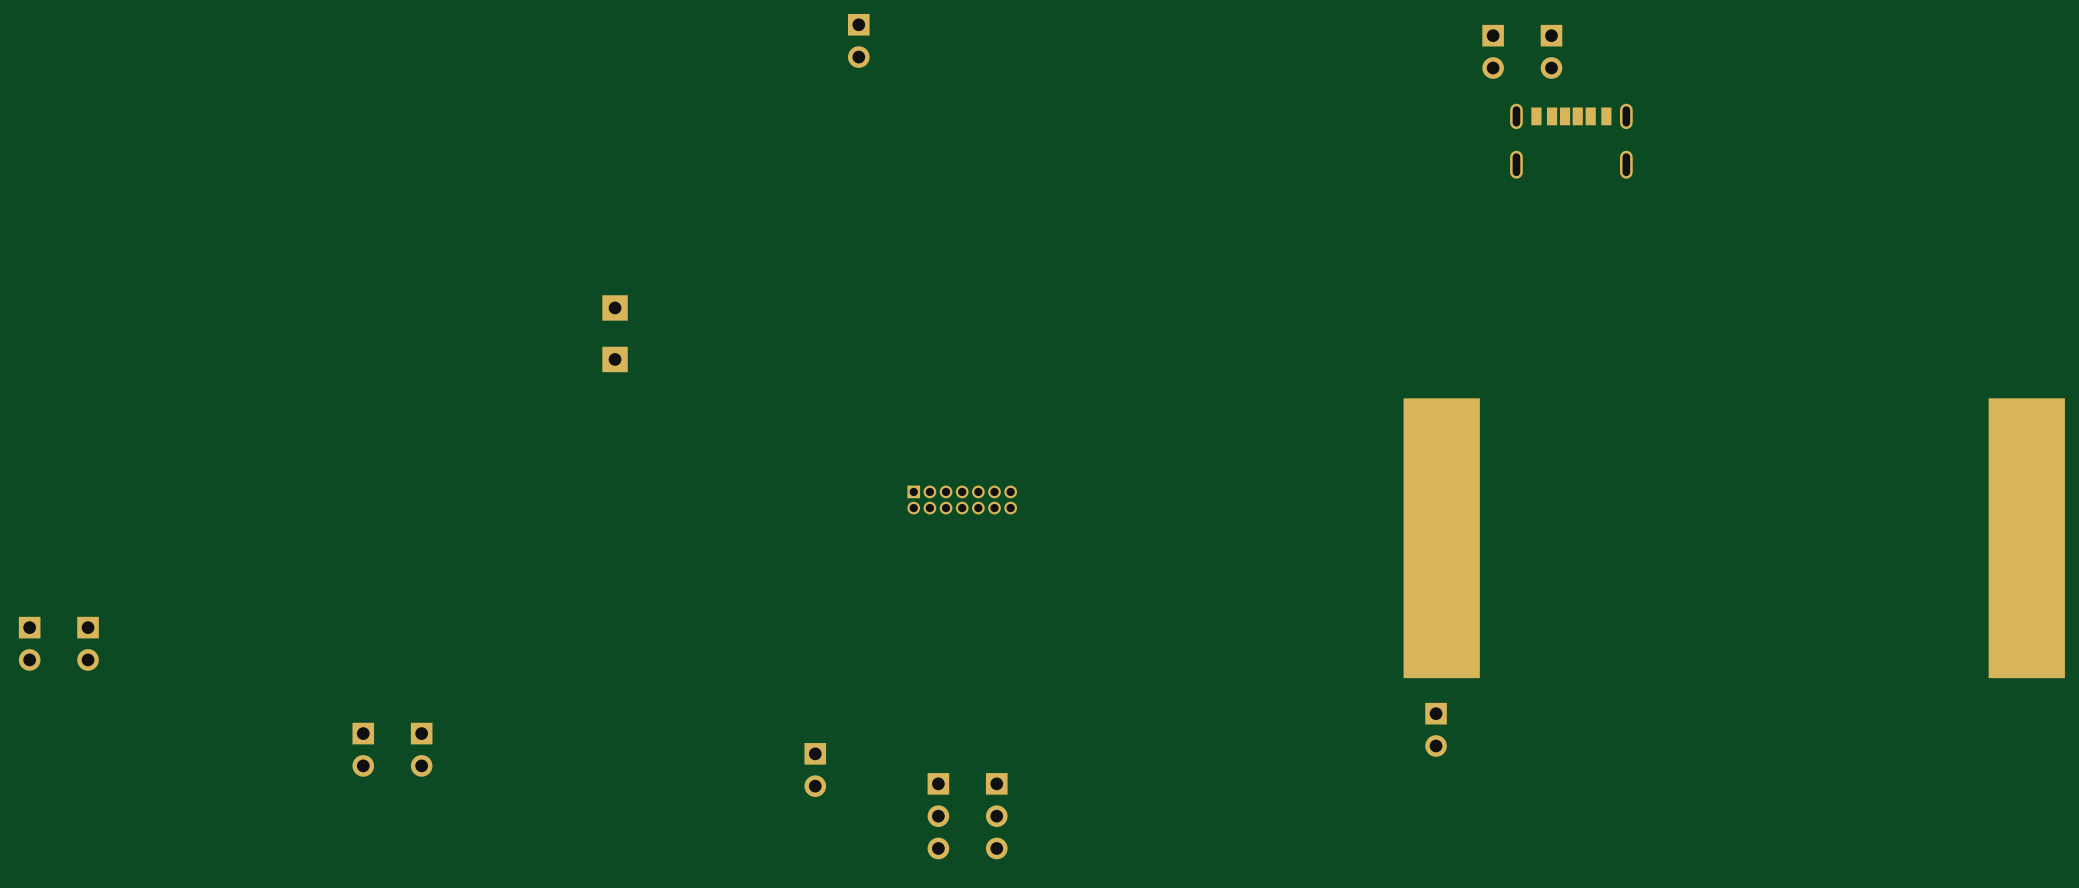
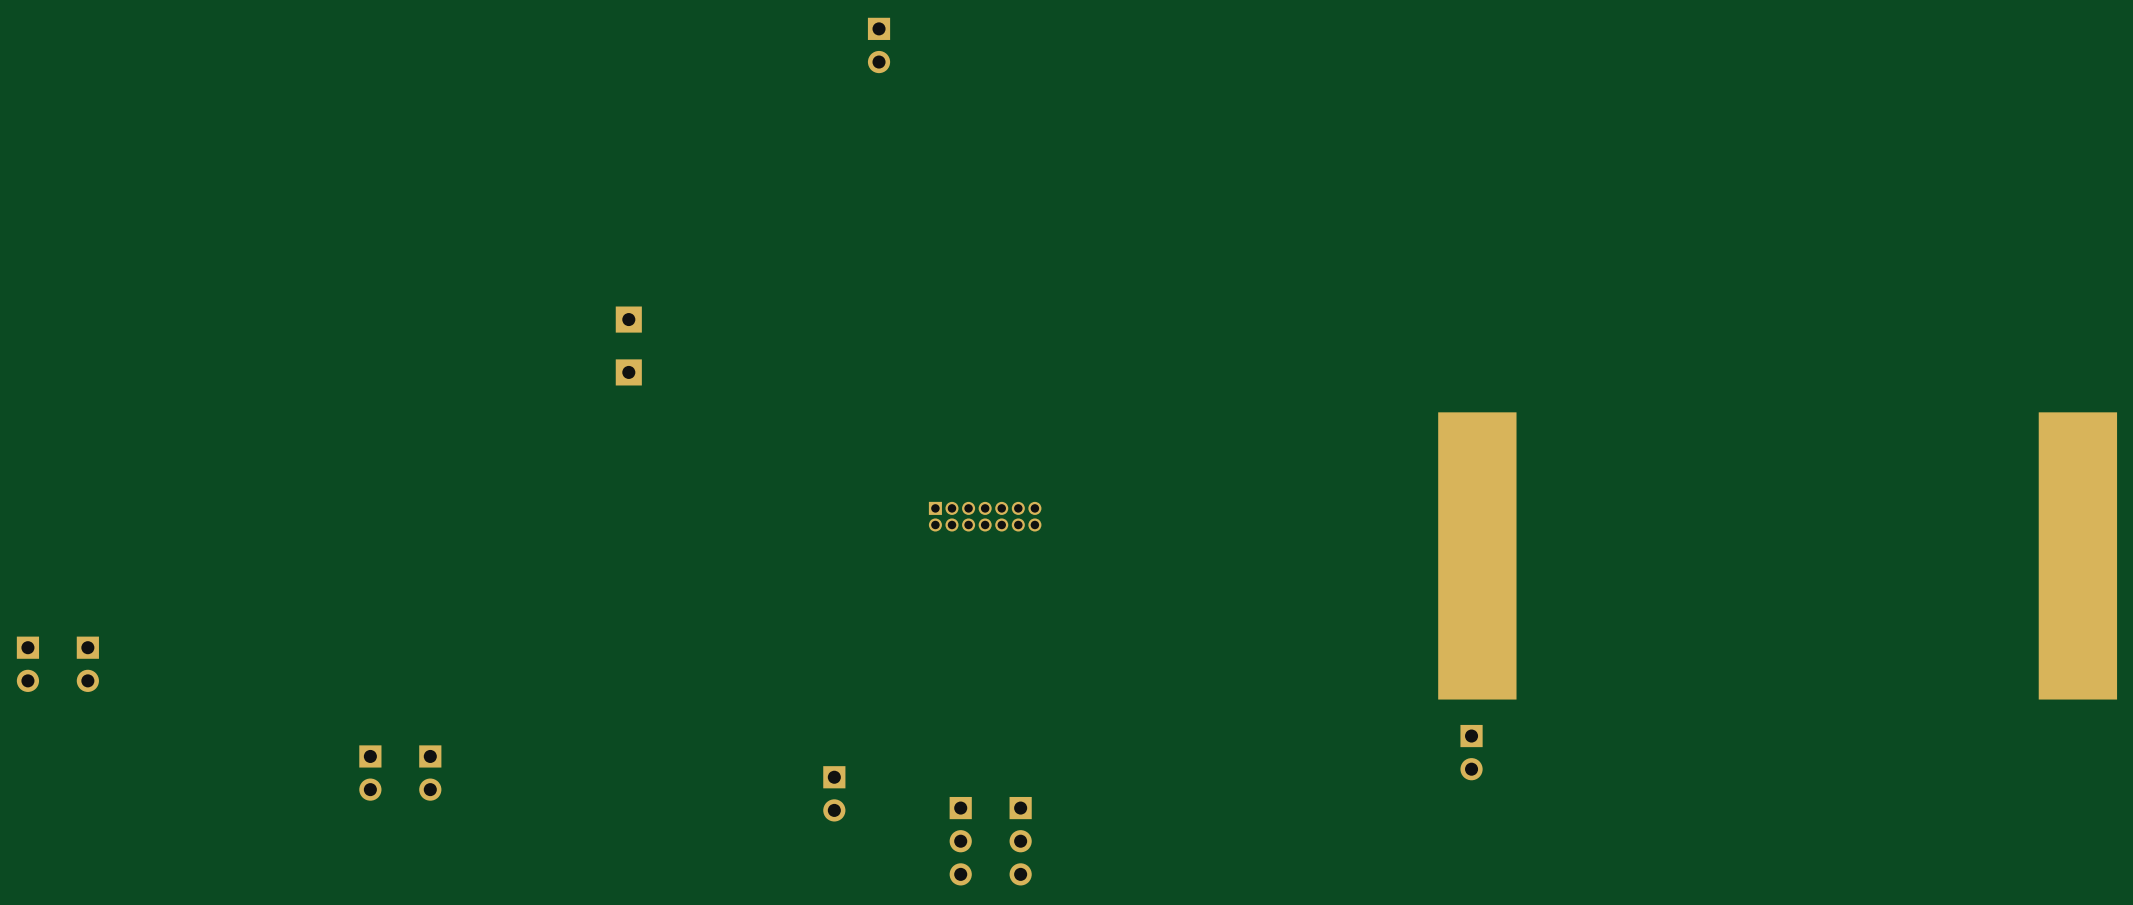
part: (1493, 51) -> none
part: (1551, 51) -> none
part: (1571, 141) -> none

